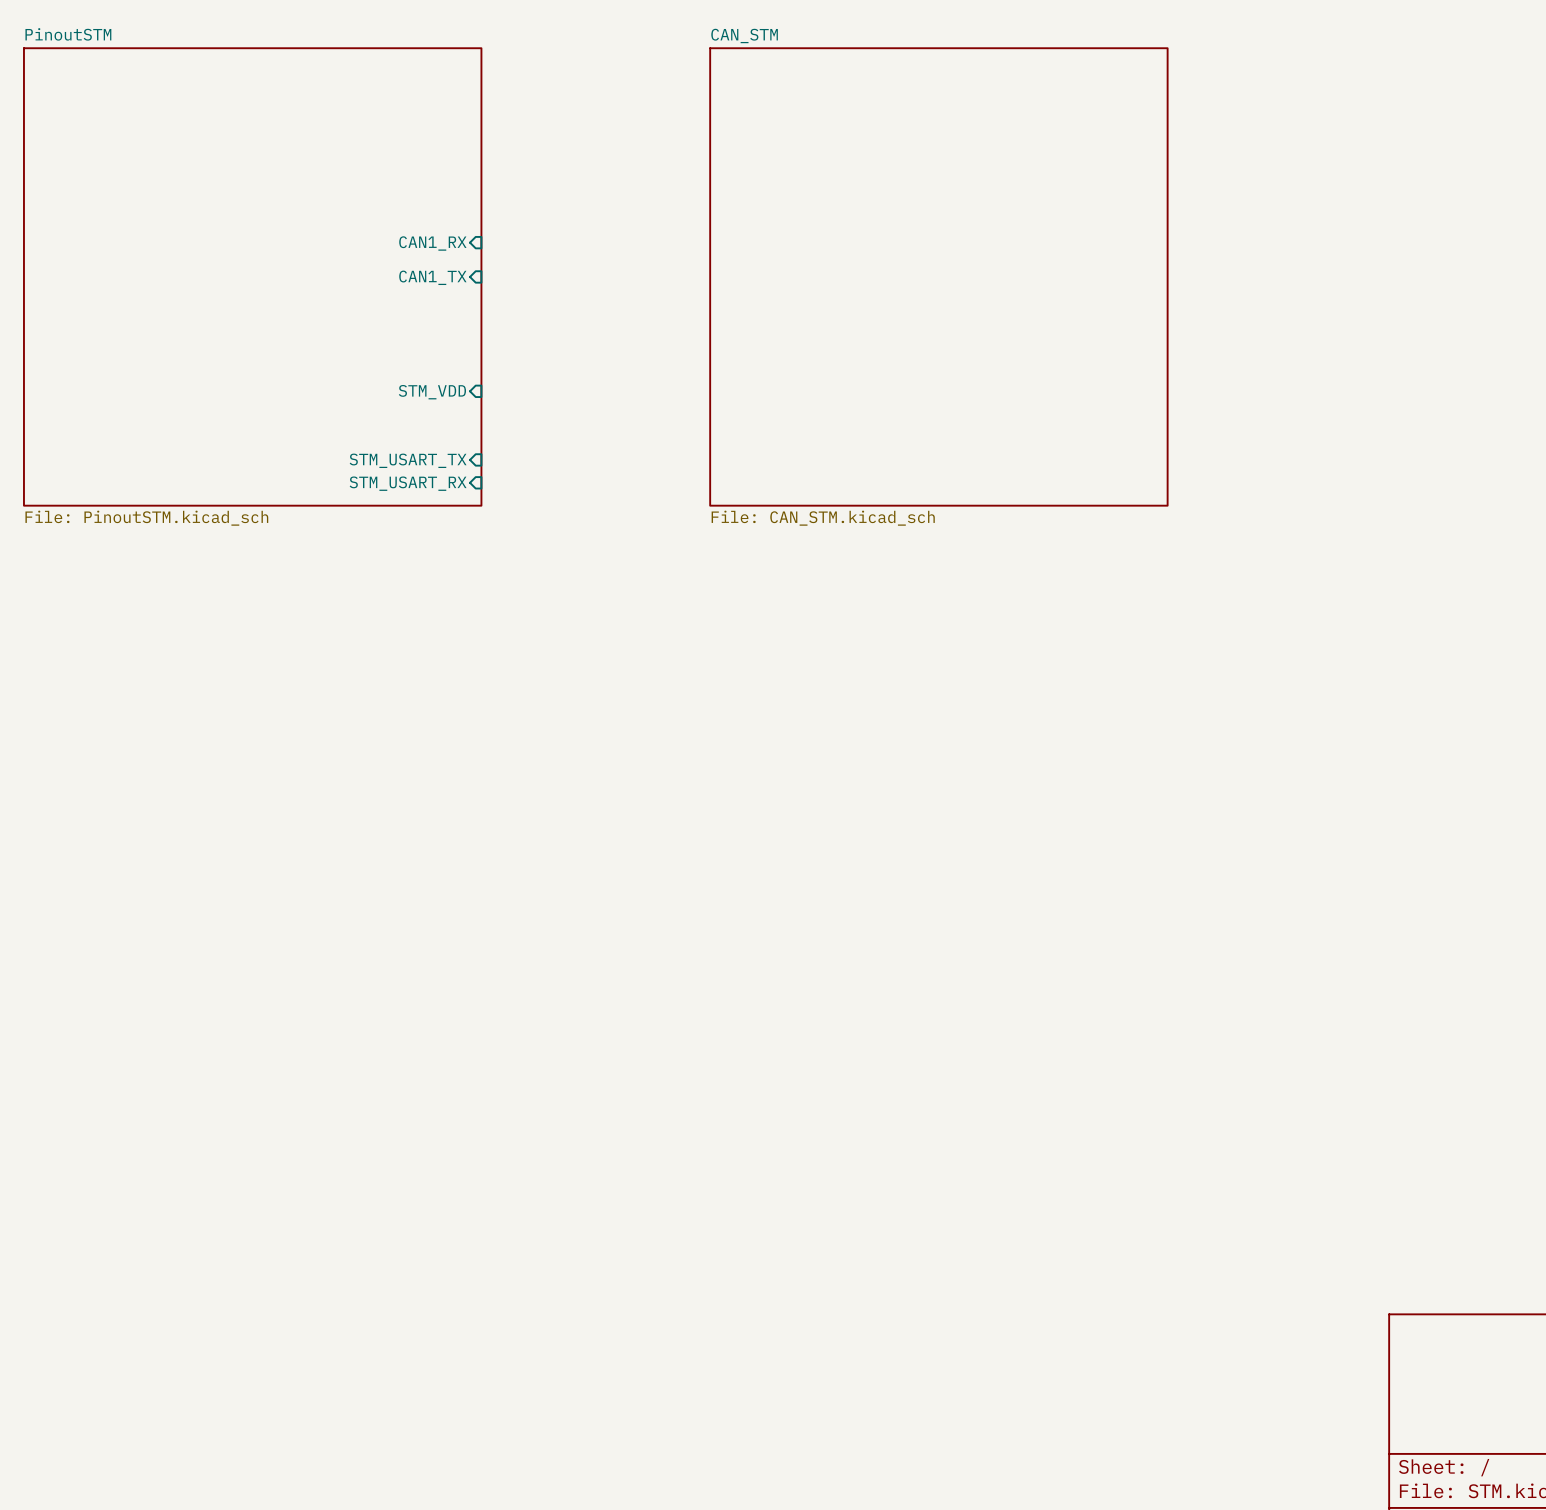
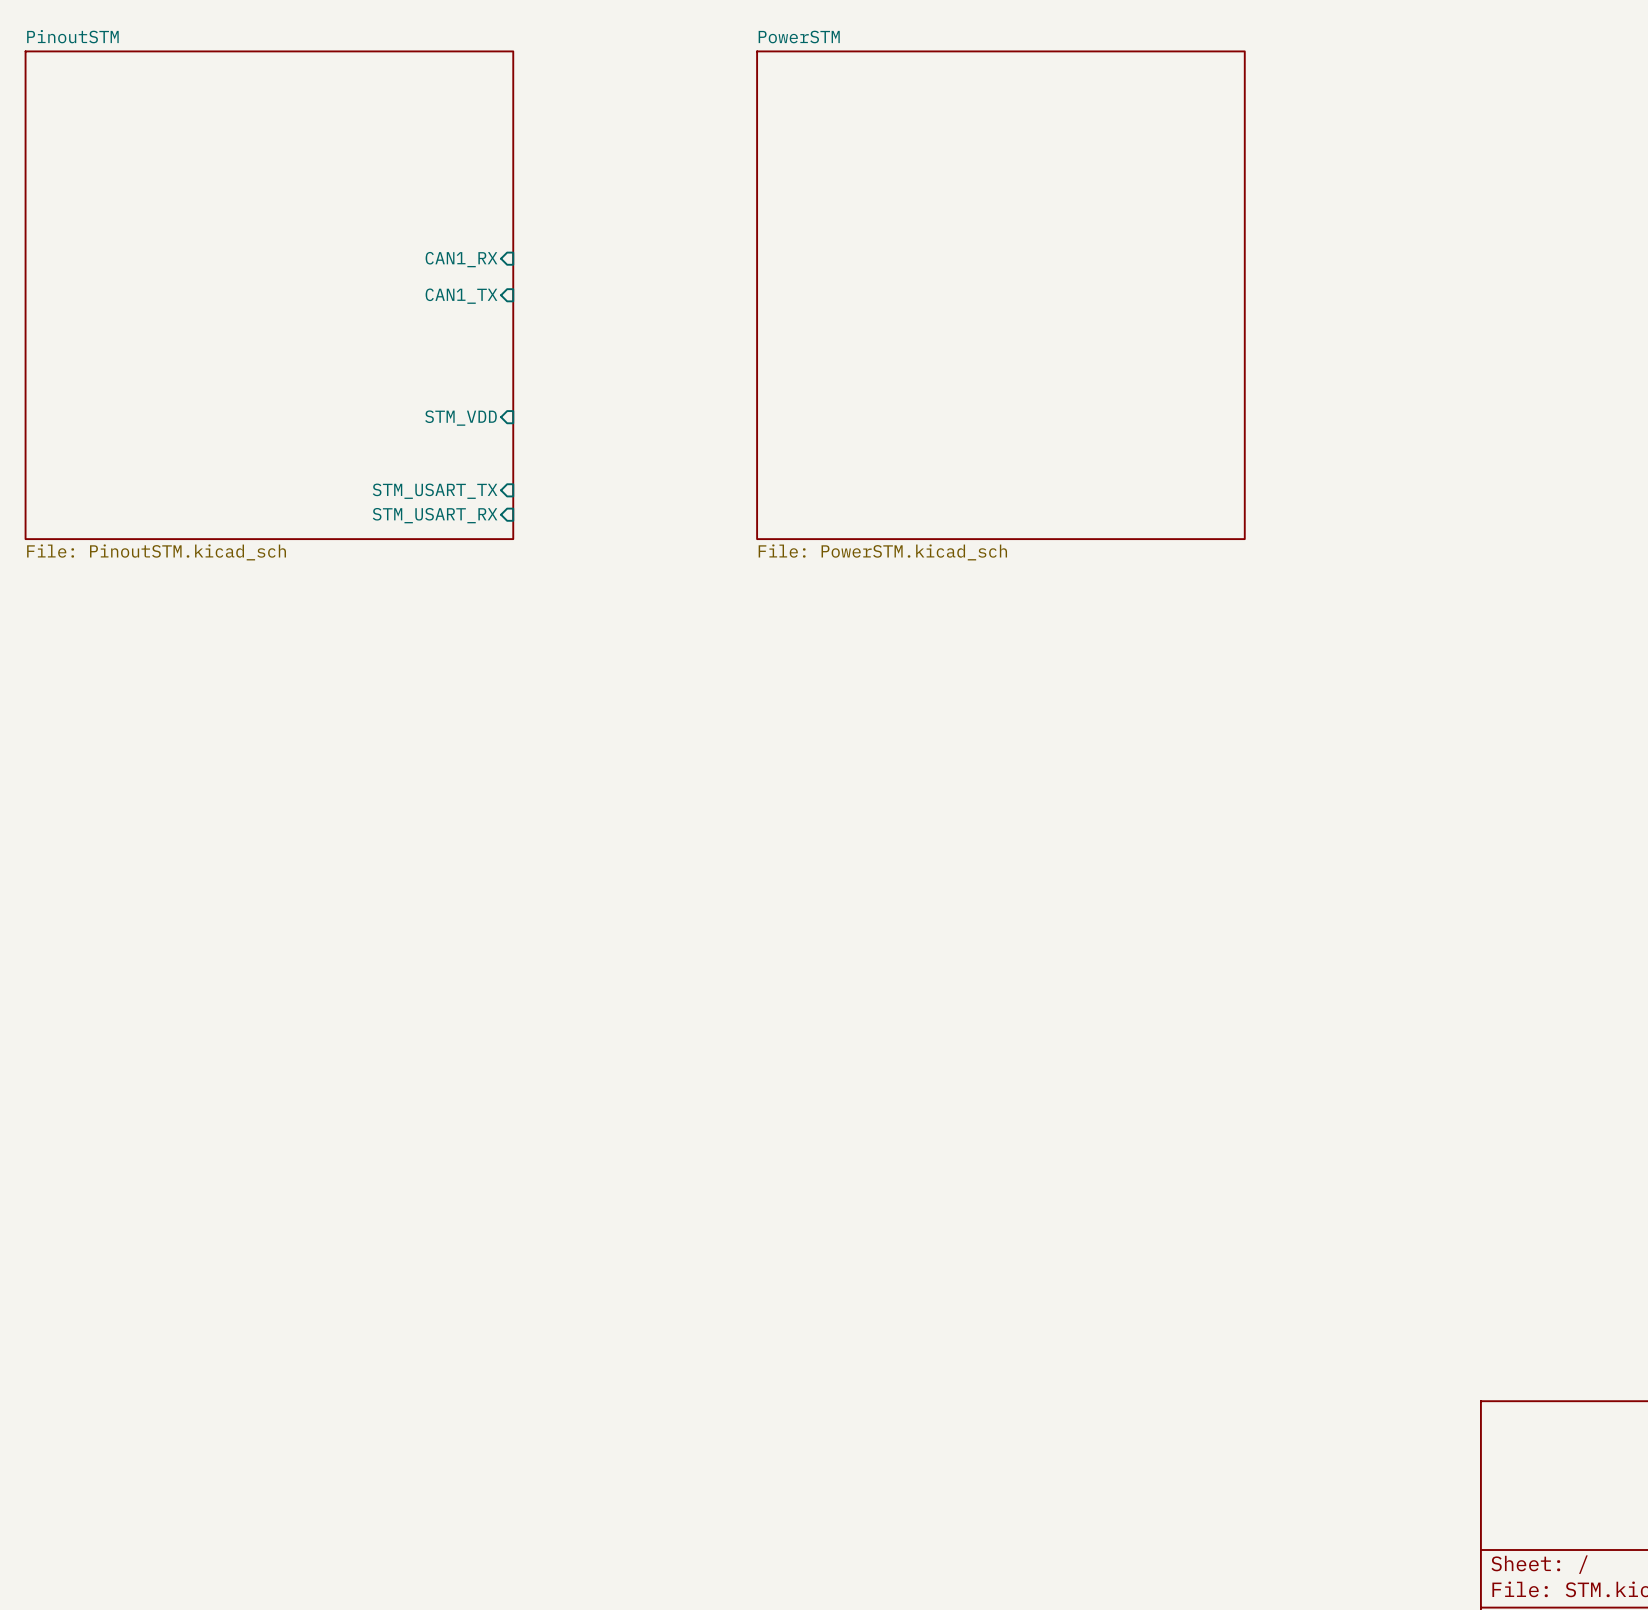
sheet CAN_STM name: CAN_STM (744, 35) -> PowerSTM (799, 36)
sheet CAN_STM value: File: CAN_STM.kicad_sch (823, 518) -> File: PowerSTM.kicad_sch (882, 552)

